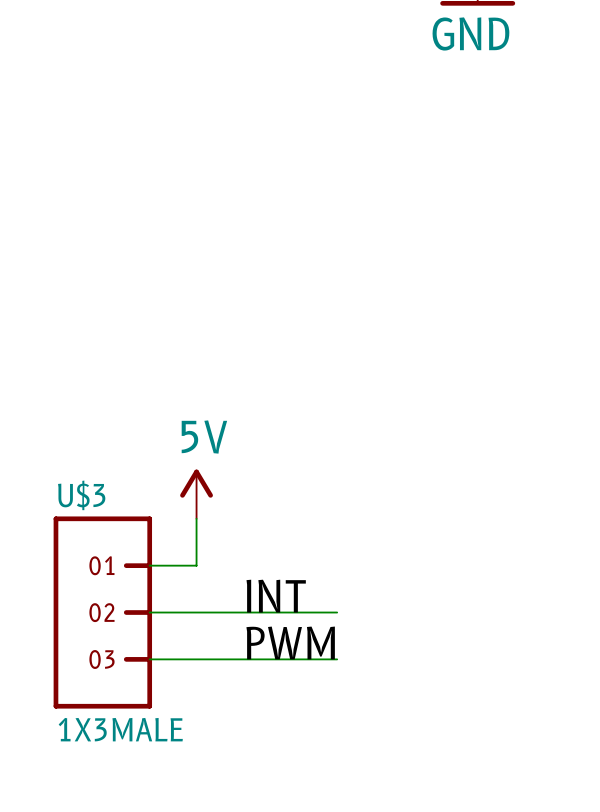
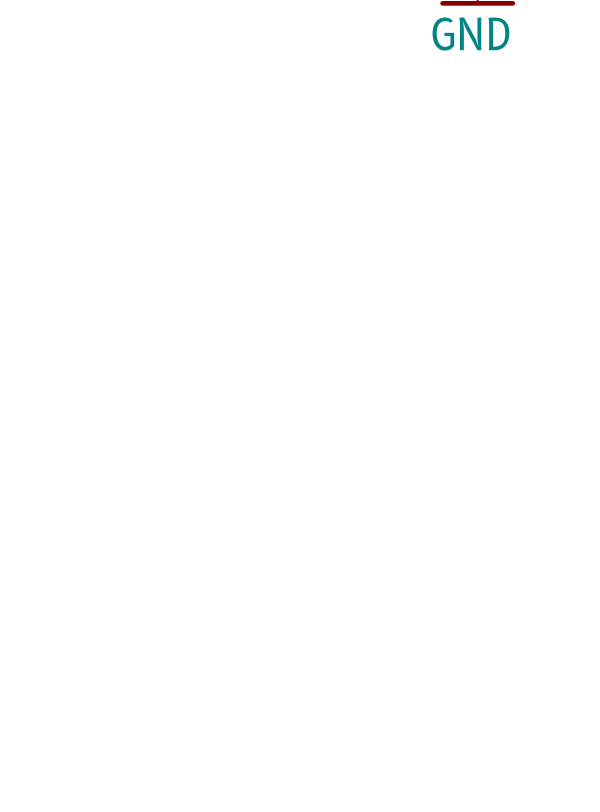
power symbol: 5V (196, 494) -> none
wire: (196, 518) (196, 565) (149, 565) -> none
label: INT (276, 596) -> none
U$3: 1X3MALE (102, 612) -> none
wire: (149, 612) (337, 612) -> none
label: PWM (290, 642) -> none
wire: (149, 659) (337, 659) -> none

